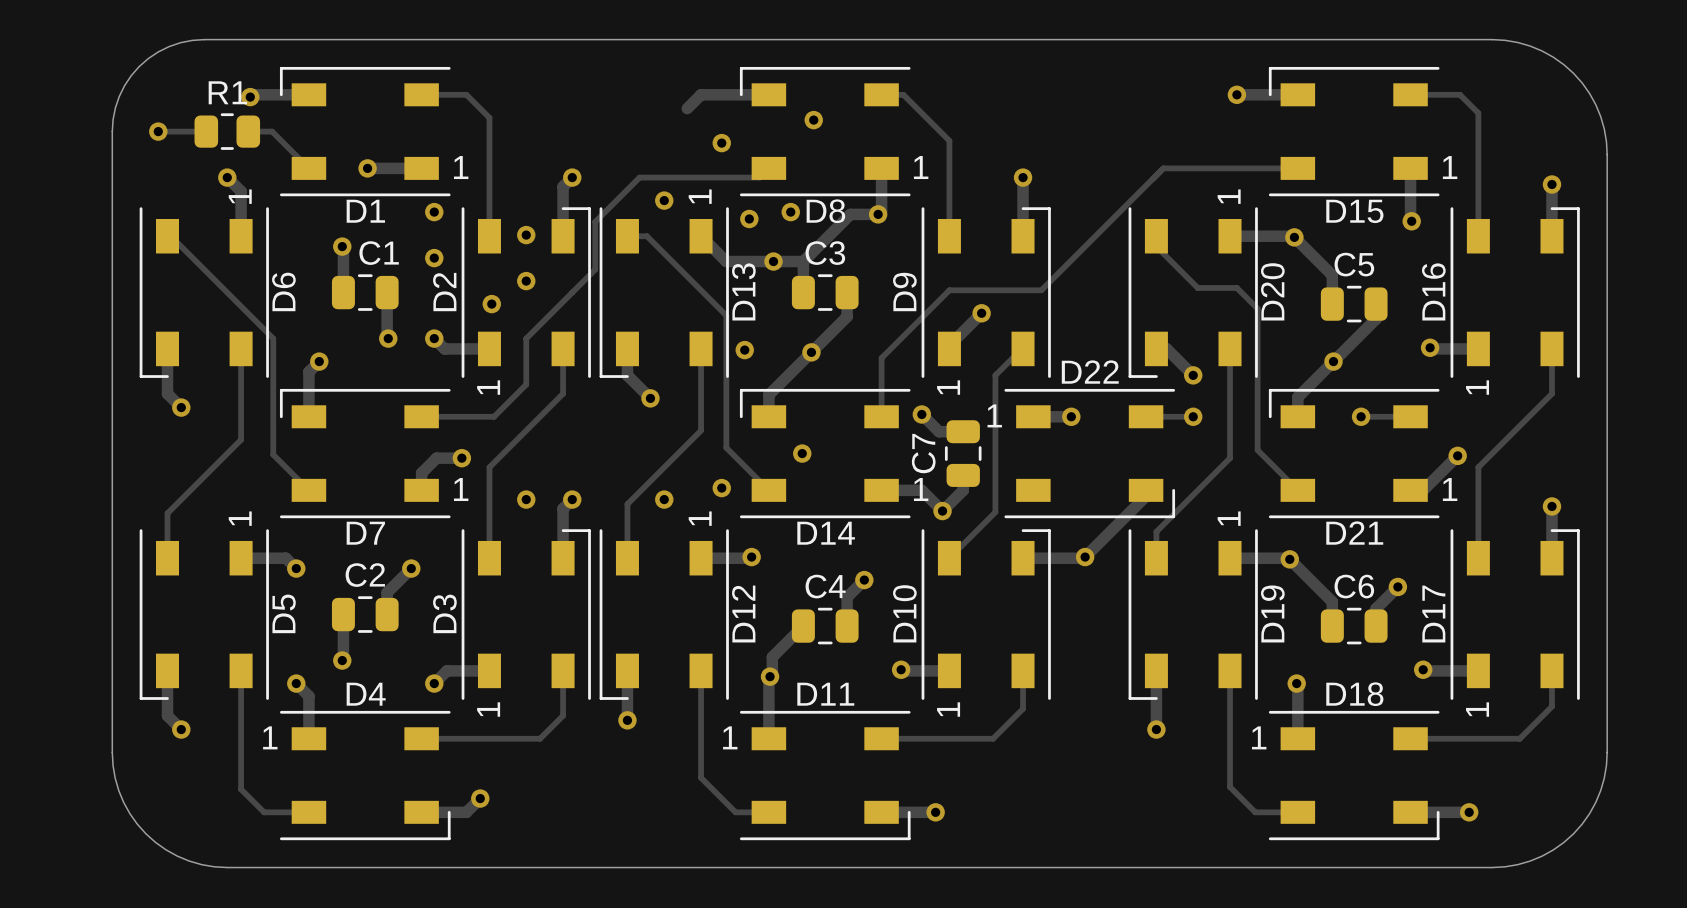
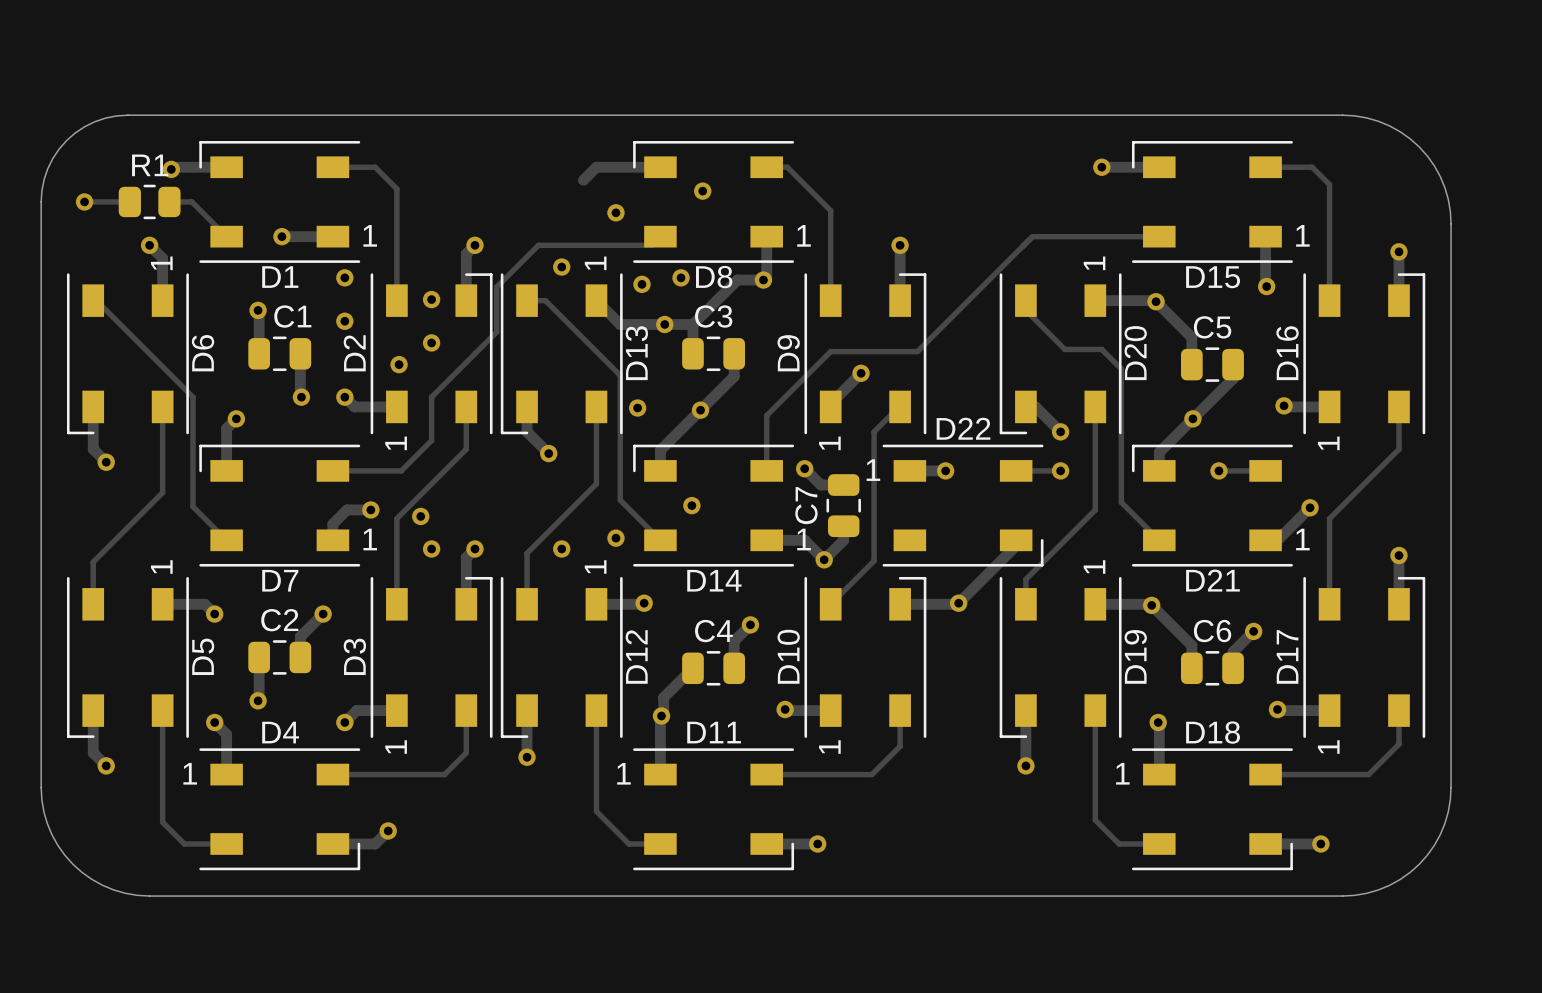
via: none -> (420, 516)

